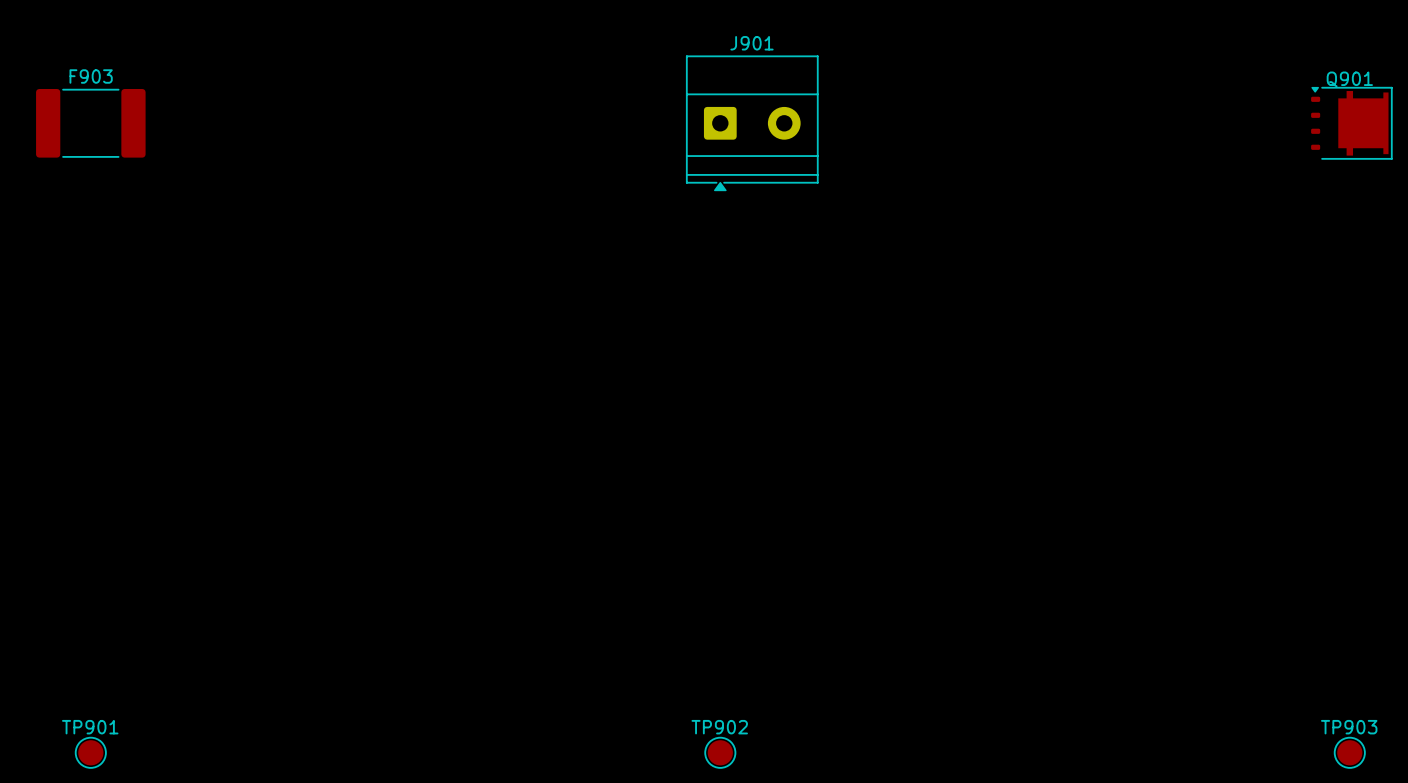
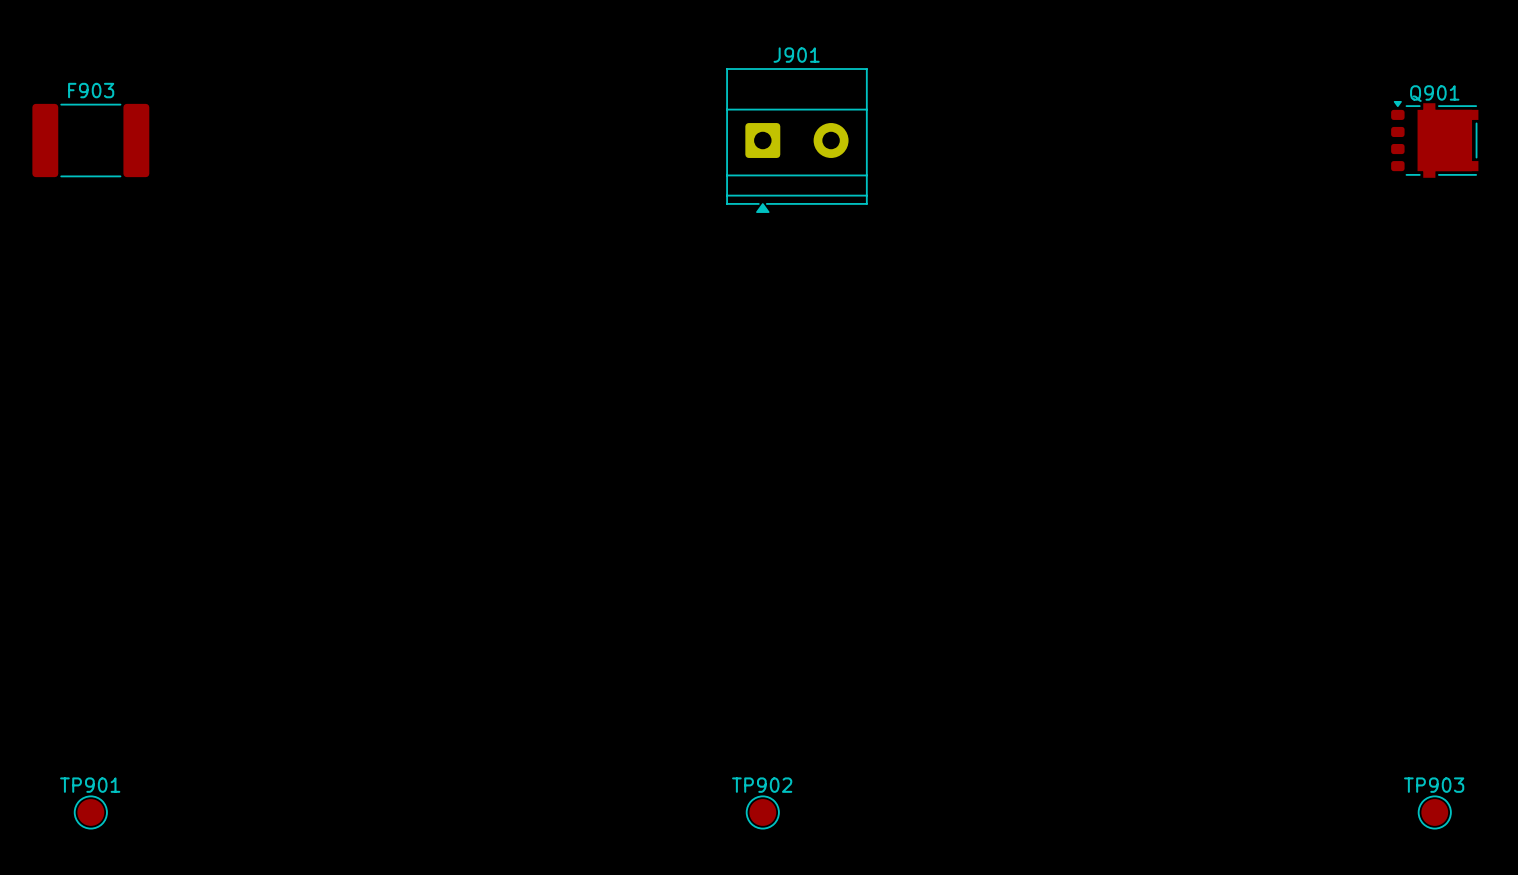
Q901 footprint: [1311, 86, 1393, 160] -> [1391, 100, 1479, 178]

